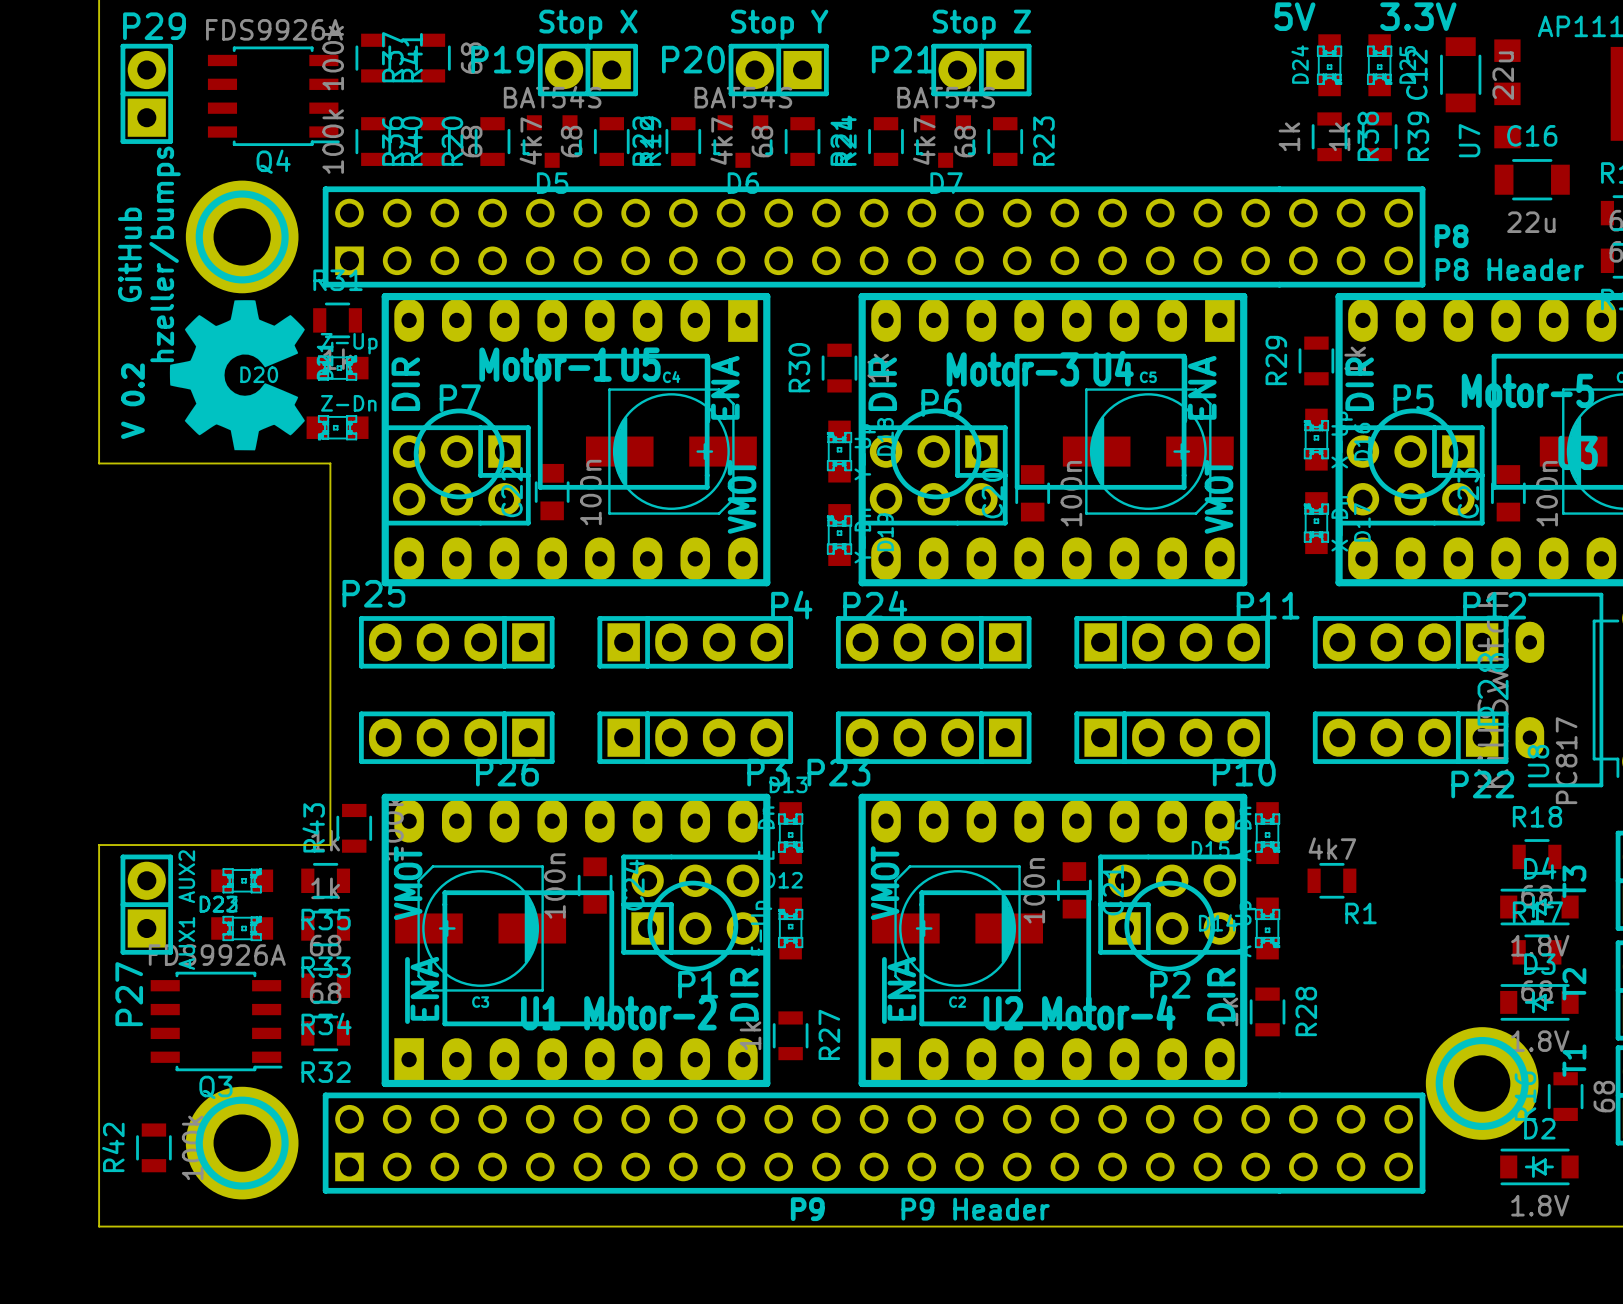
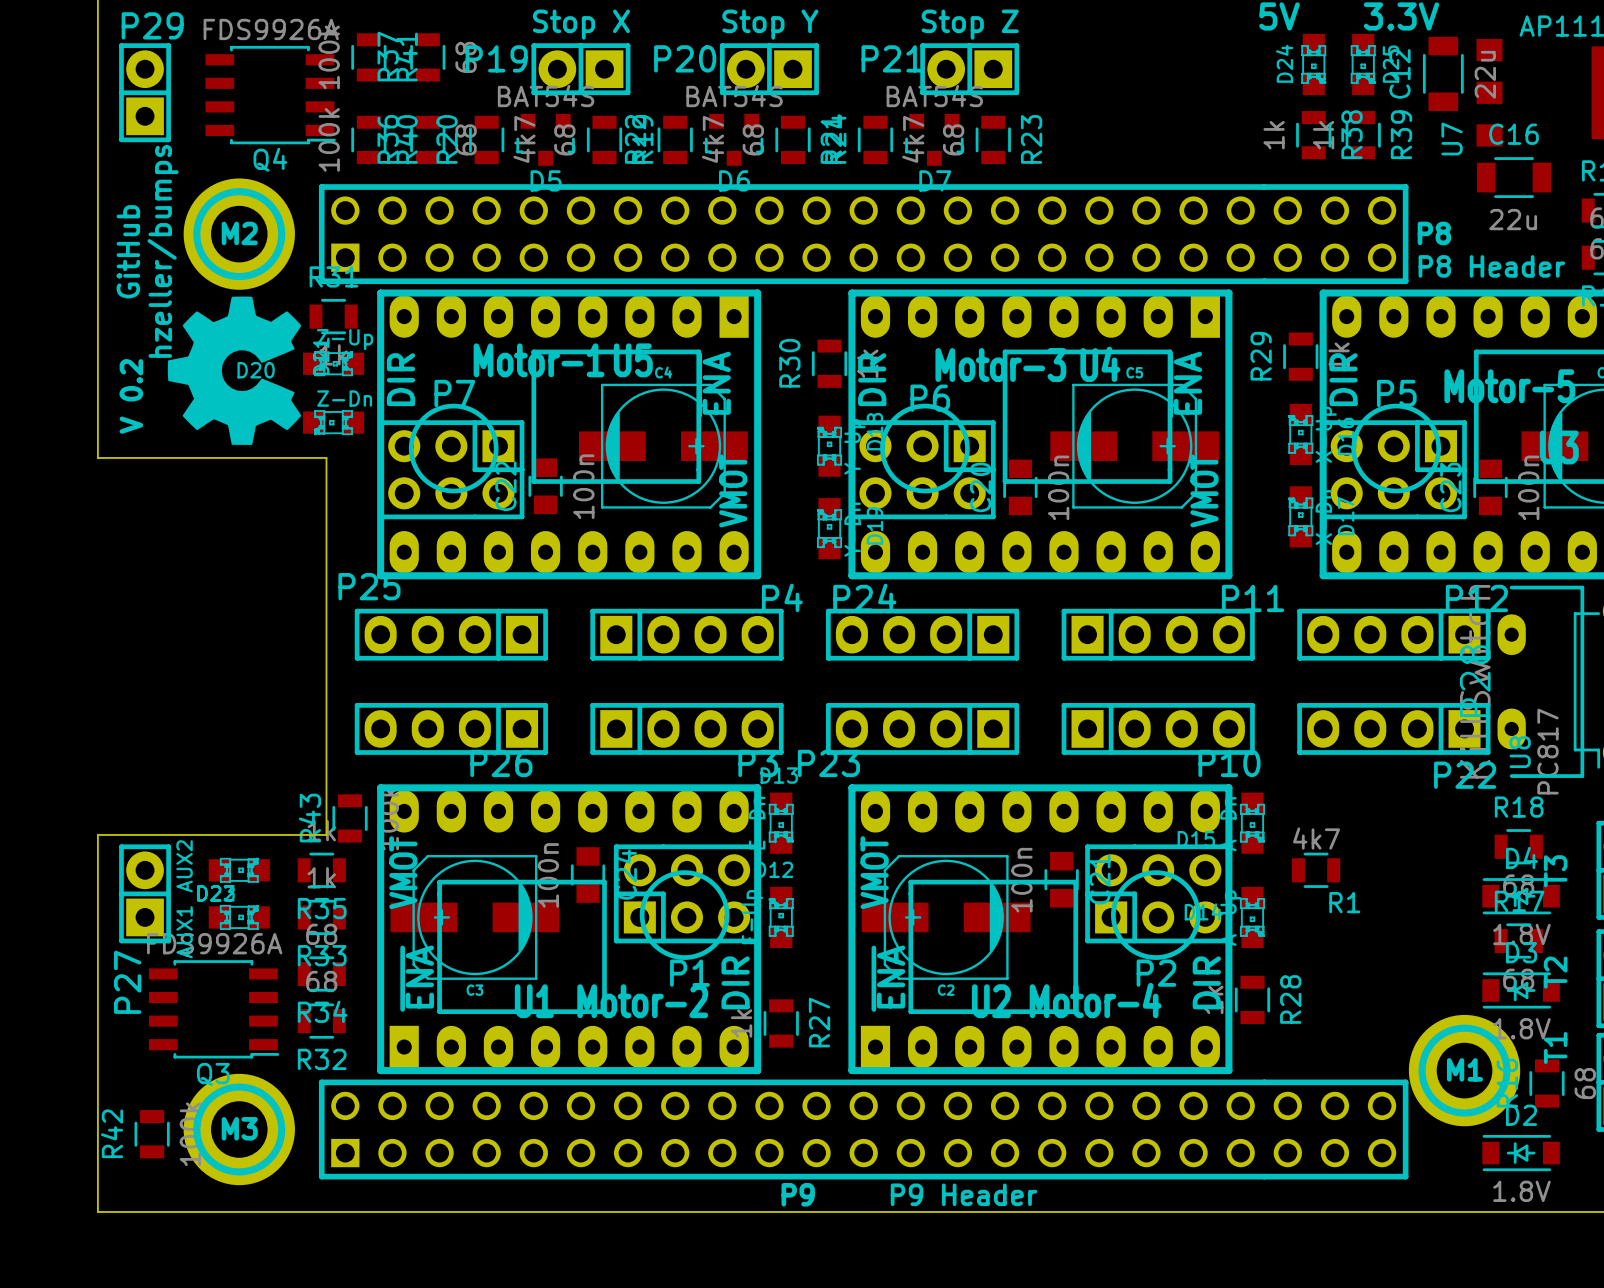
M2 name: none -> M2 (239, 233)
M1 name: none -> M1 (1464, 1069)
M3 name: none -> M3 (239, 1128)

